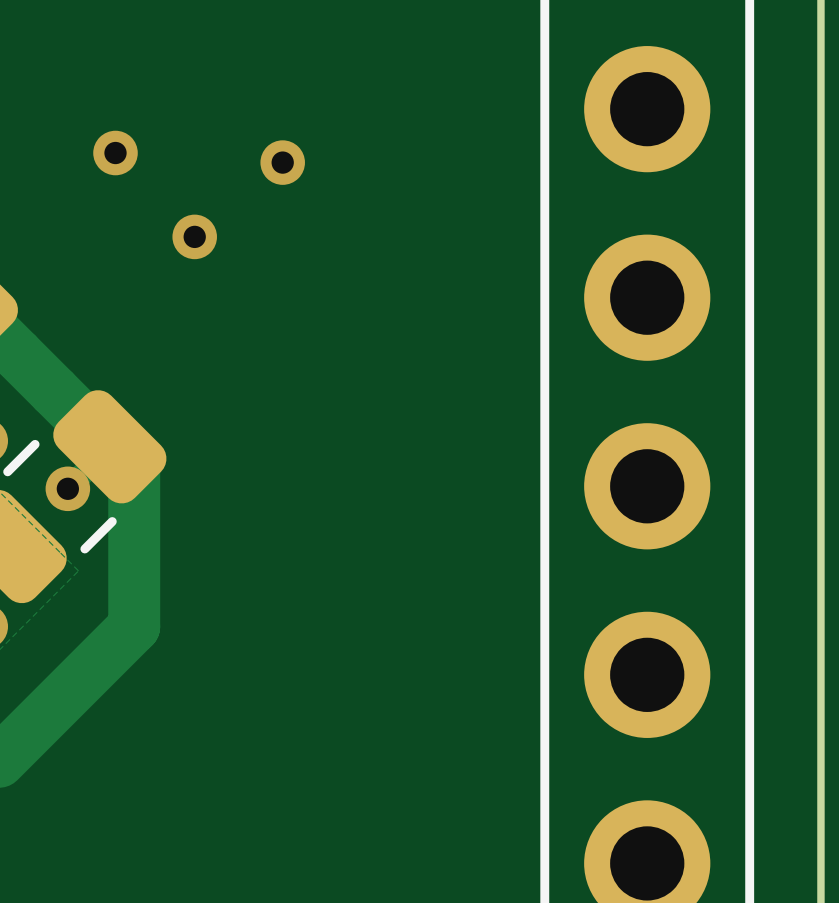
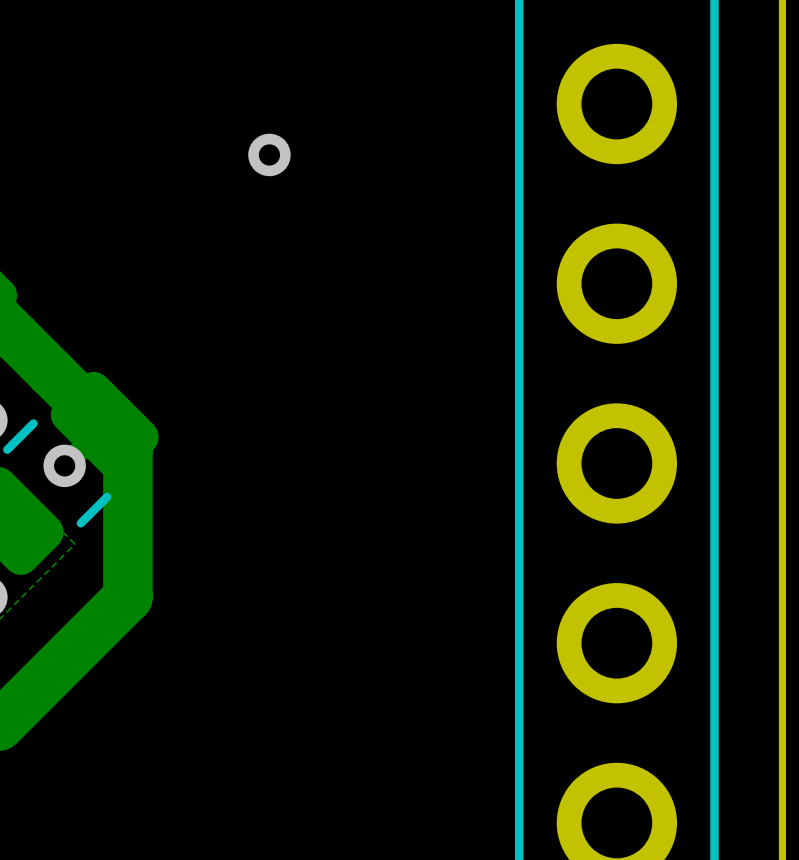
via: (115, 153) -> none
via: (194, 236) -> none

